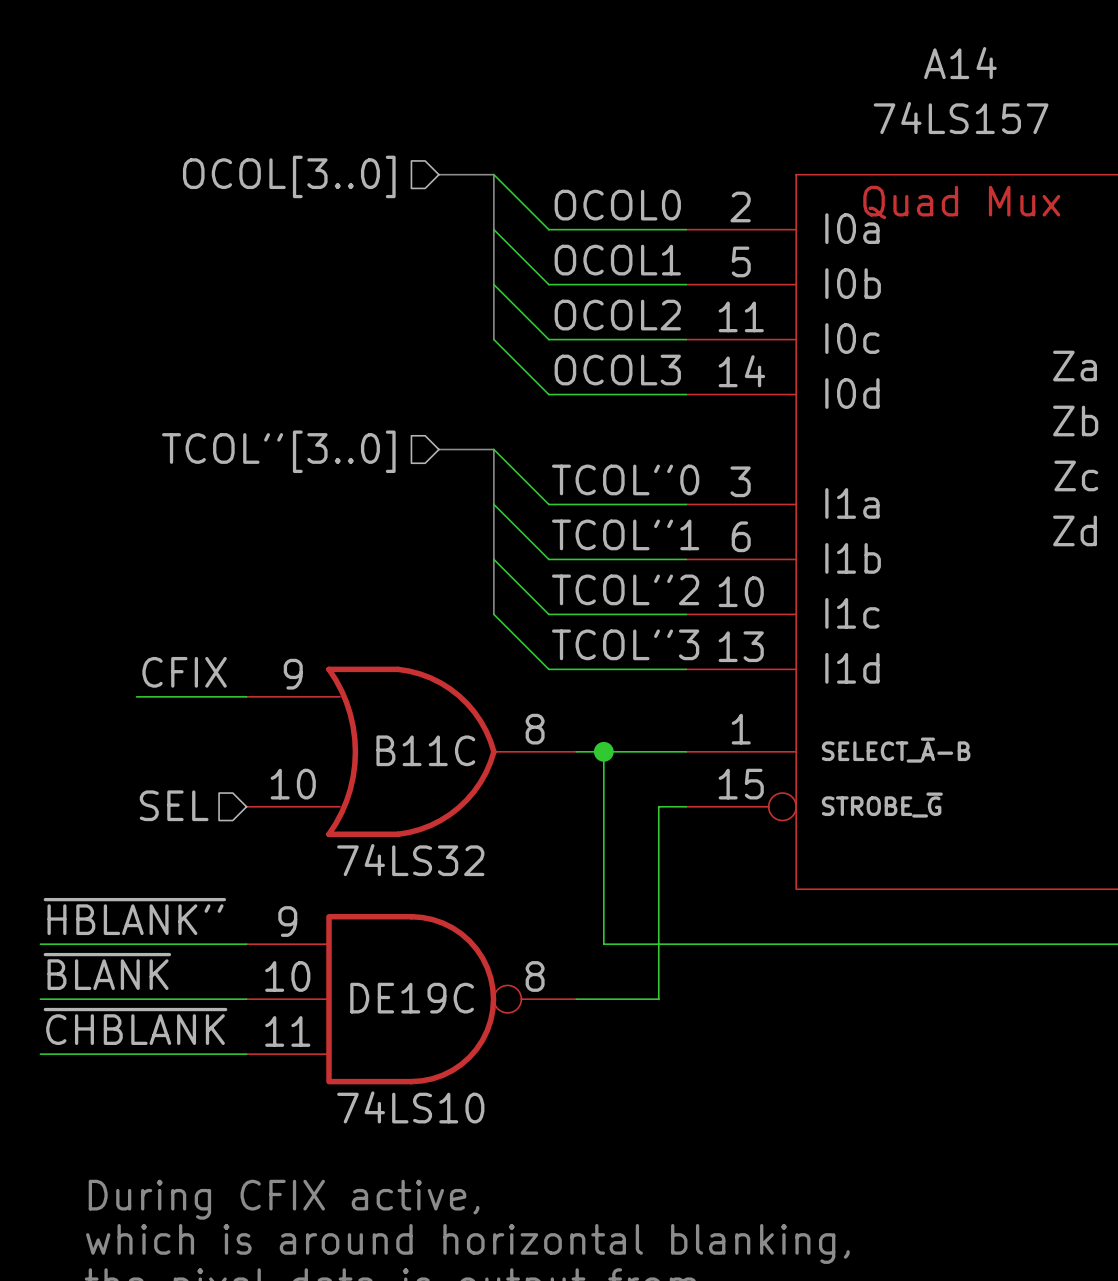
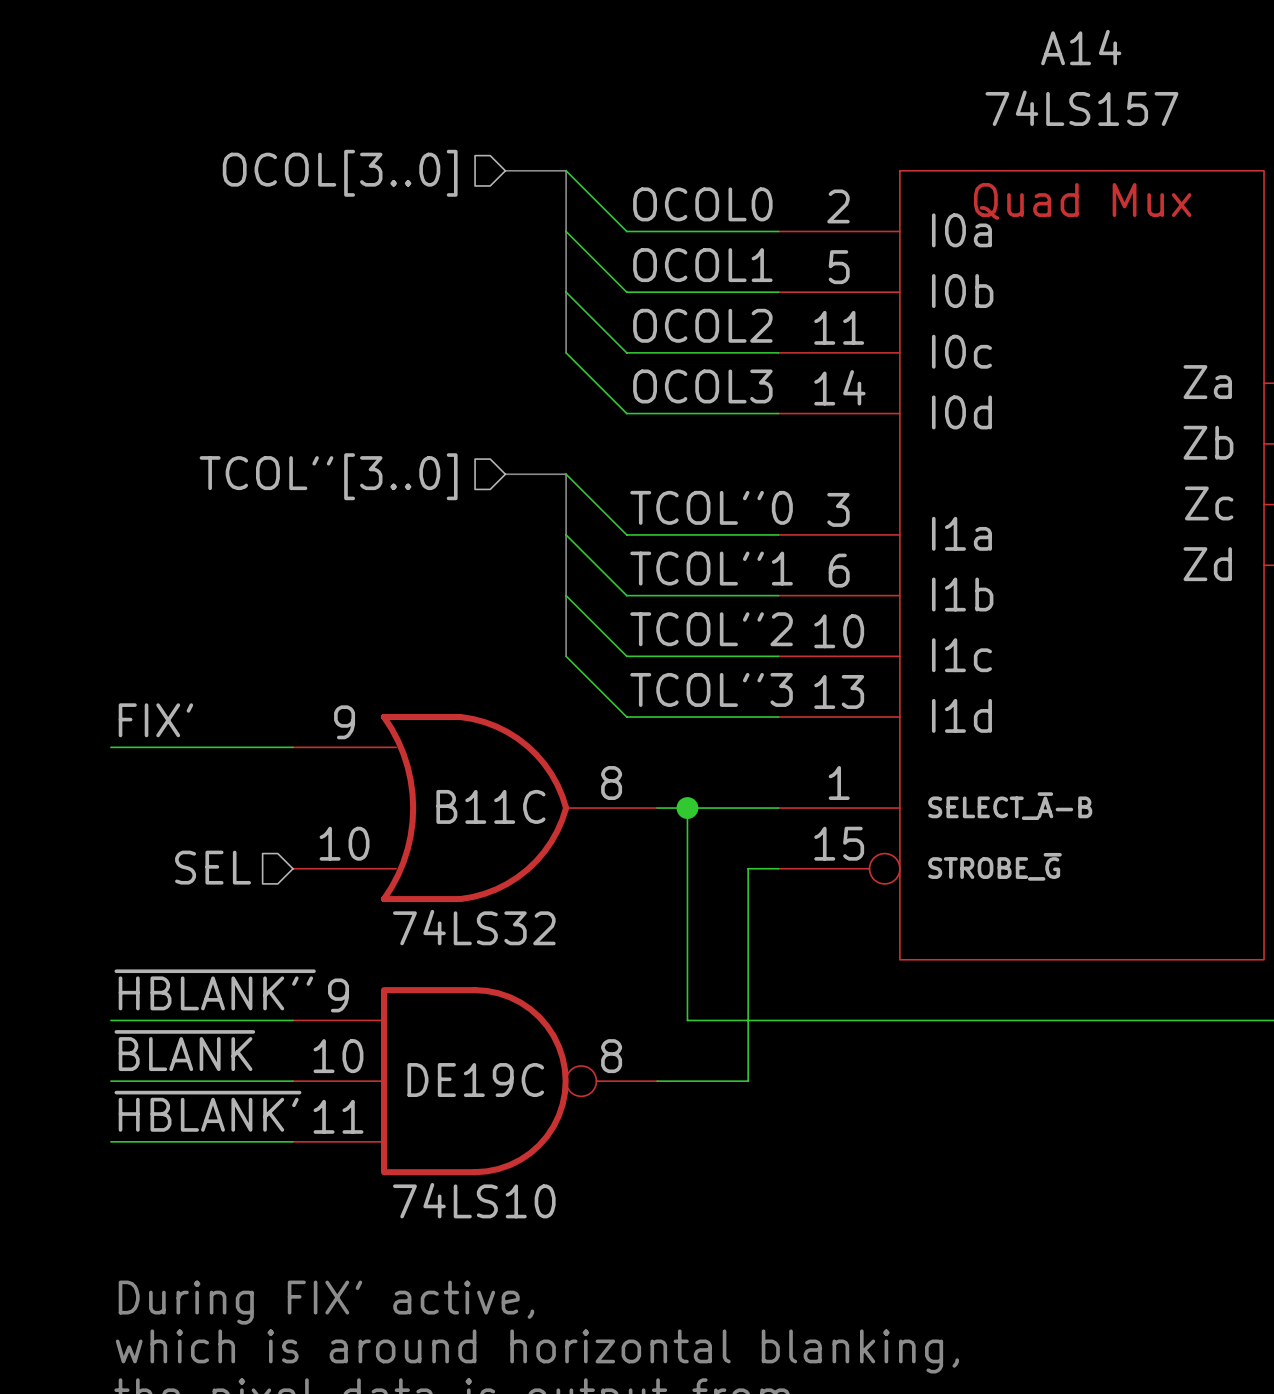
label: CFIX (184, 672) -> FIX' (155, 720)
wire: none -> (110, 747) (171, 747)
label position: ~{HBLANK''} (134, 916) -> ~{HBLANK''} (215, 989)
wire: (40, 944) (81, 944) -> none
label position: ~{BLANK} (107, 971) -> ~{BLANK} (184, 1050)
wire: (40, 999) (81, 999) -> none
label: ~{CHBLANK} (135, 1026) -> ~{HBLANK'} (207, 1111)
wire: (40, 1054) (81, 1054) -> none
text: During CFIX active, (284, 1199) -> During FIX' active, (326, 1302)

